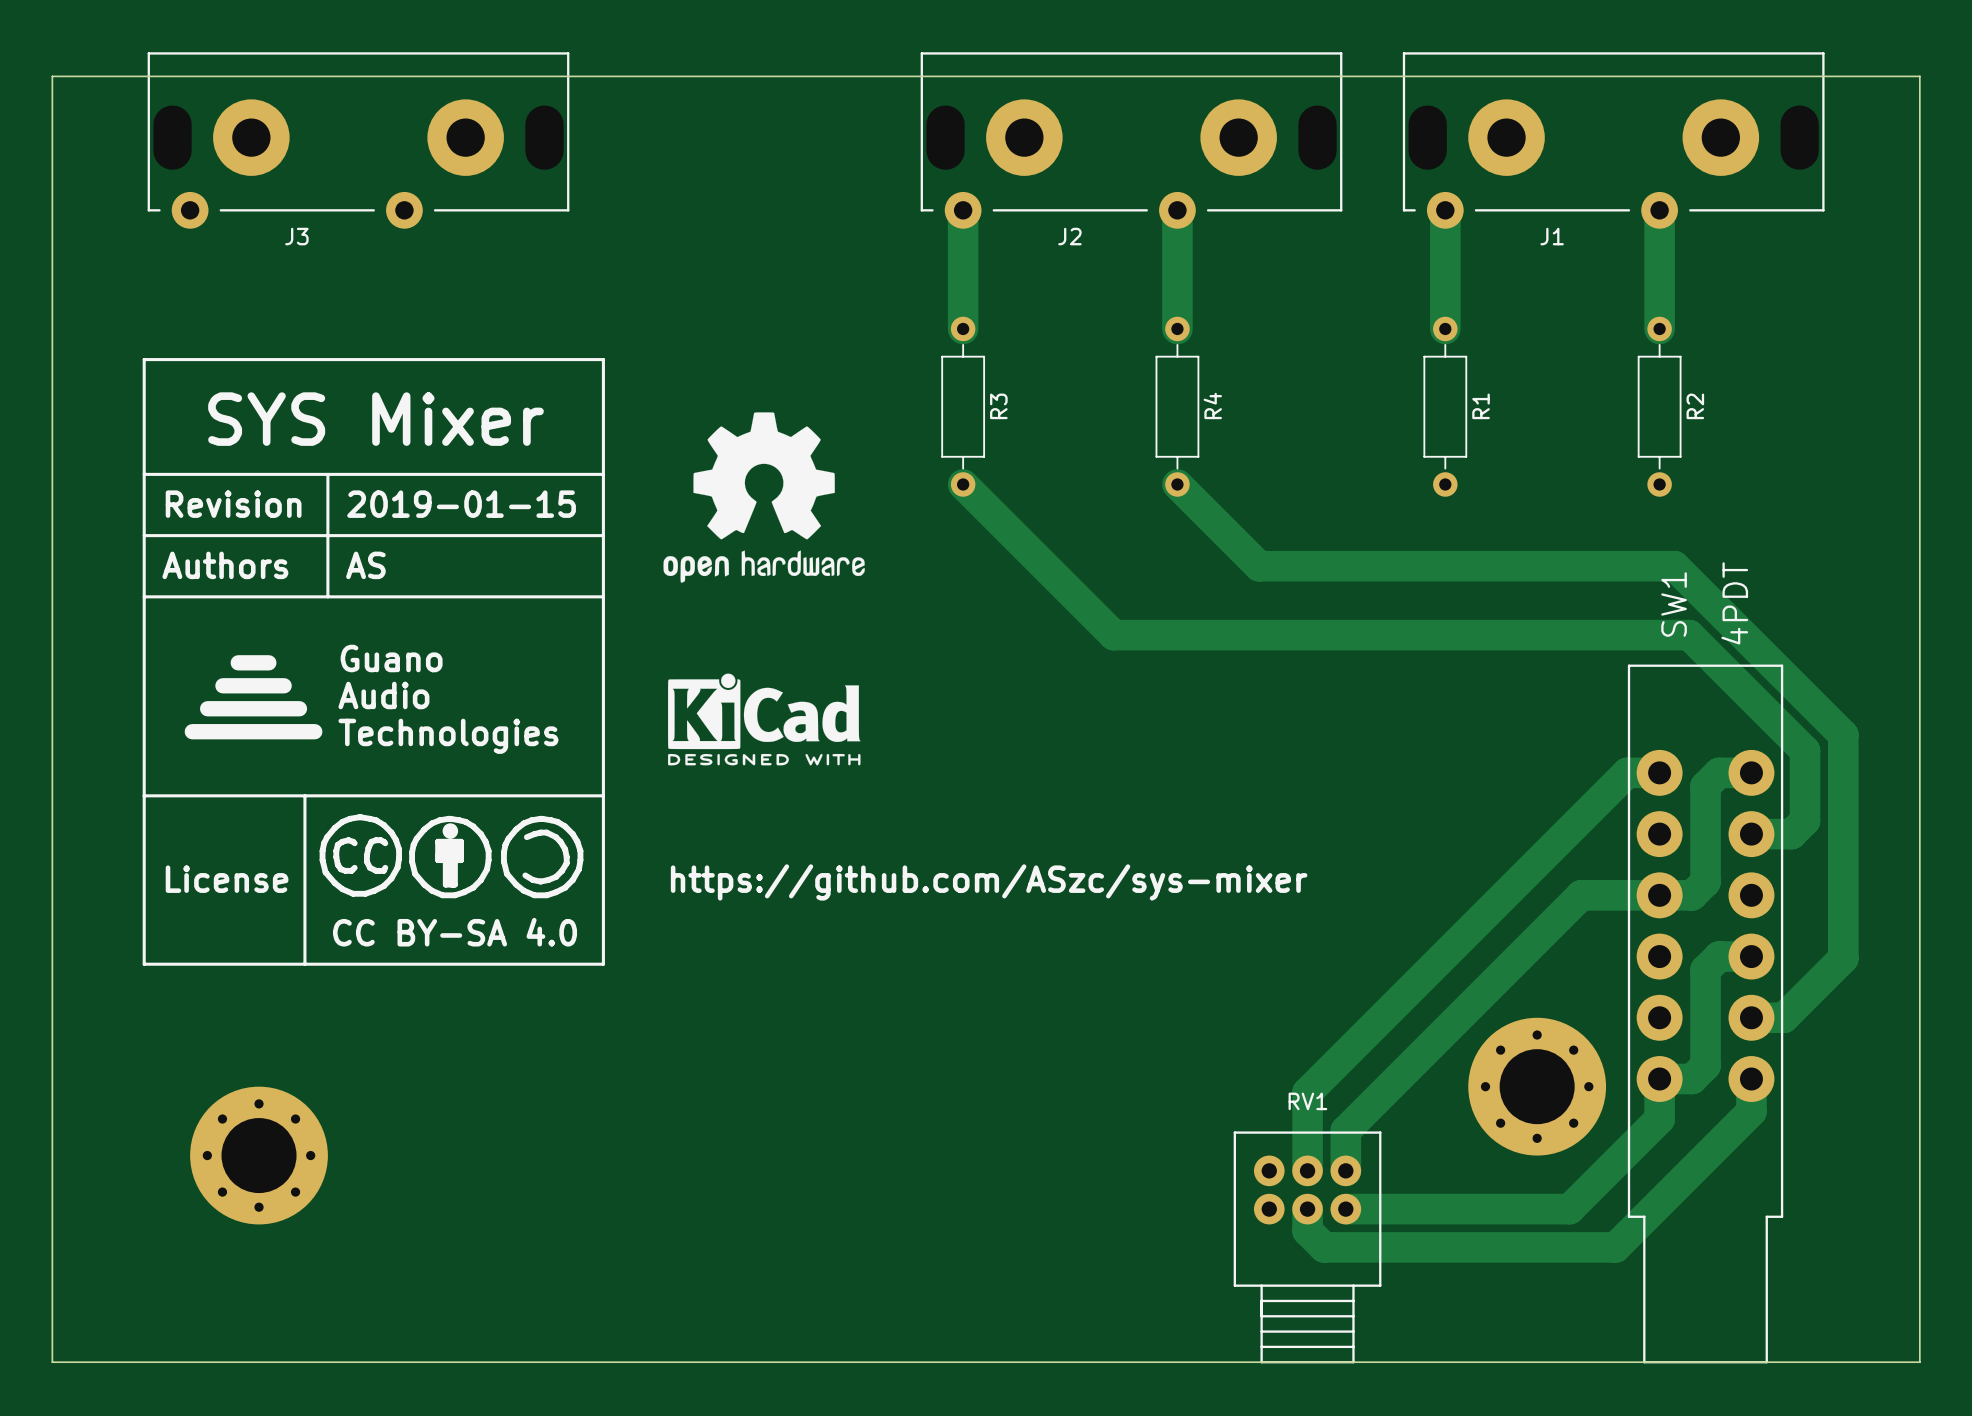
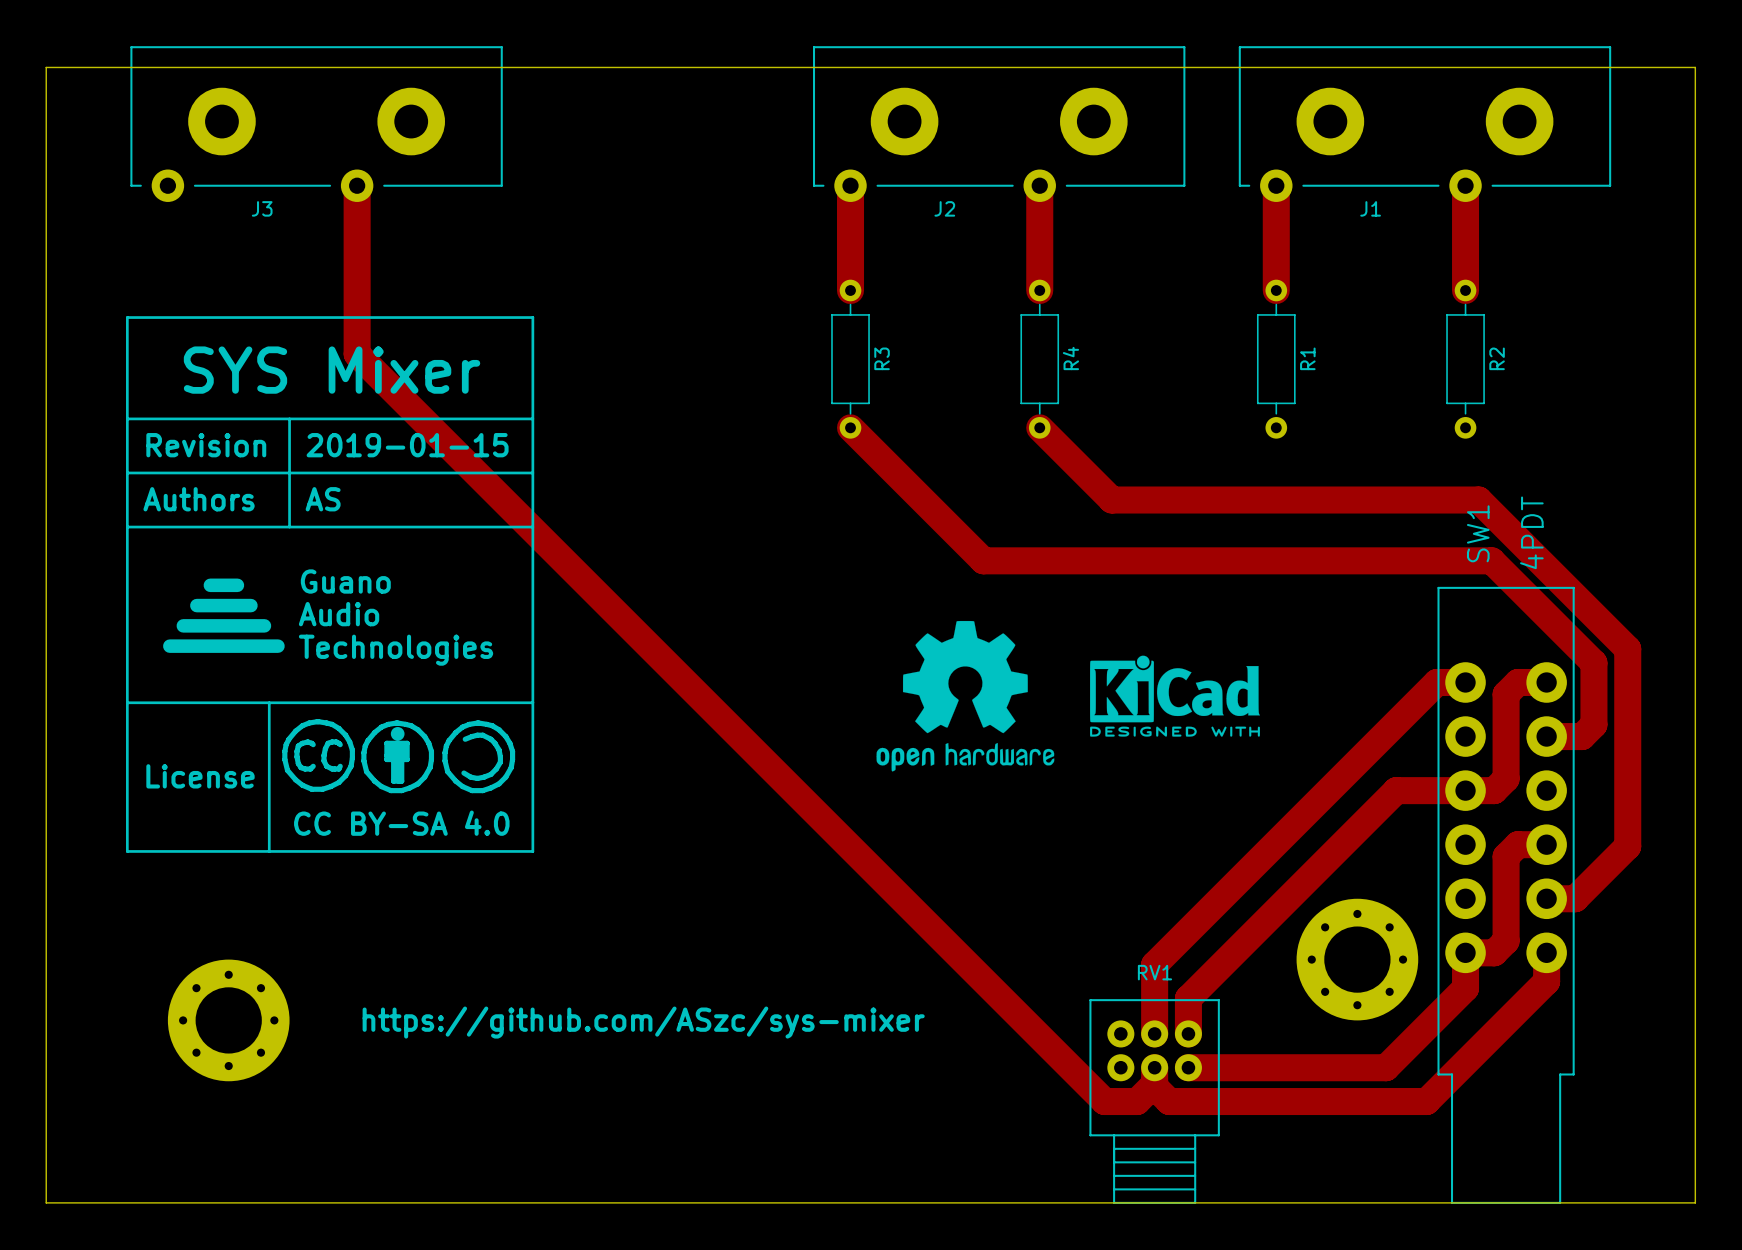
track: none -> (357, 185) (357, 354) (1104, 1101) (1137, 1101) (1154, 1083)
drawing: [663, 412, 865, 583] -> none
drawing: [667, 673, 861, 766] -> none
drawing: none -> [876, 620, 1055, 772]
drawing: none -> [1090, 655, 1260, 737]
text position: https://github.com/ASzc/sys-mixer (989, 882) -> https://github.com/ASzc/sys-mixer (643, 1022)

